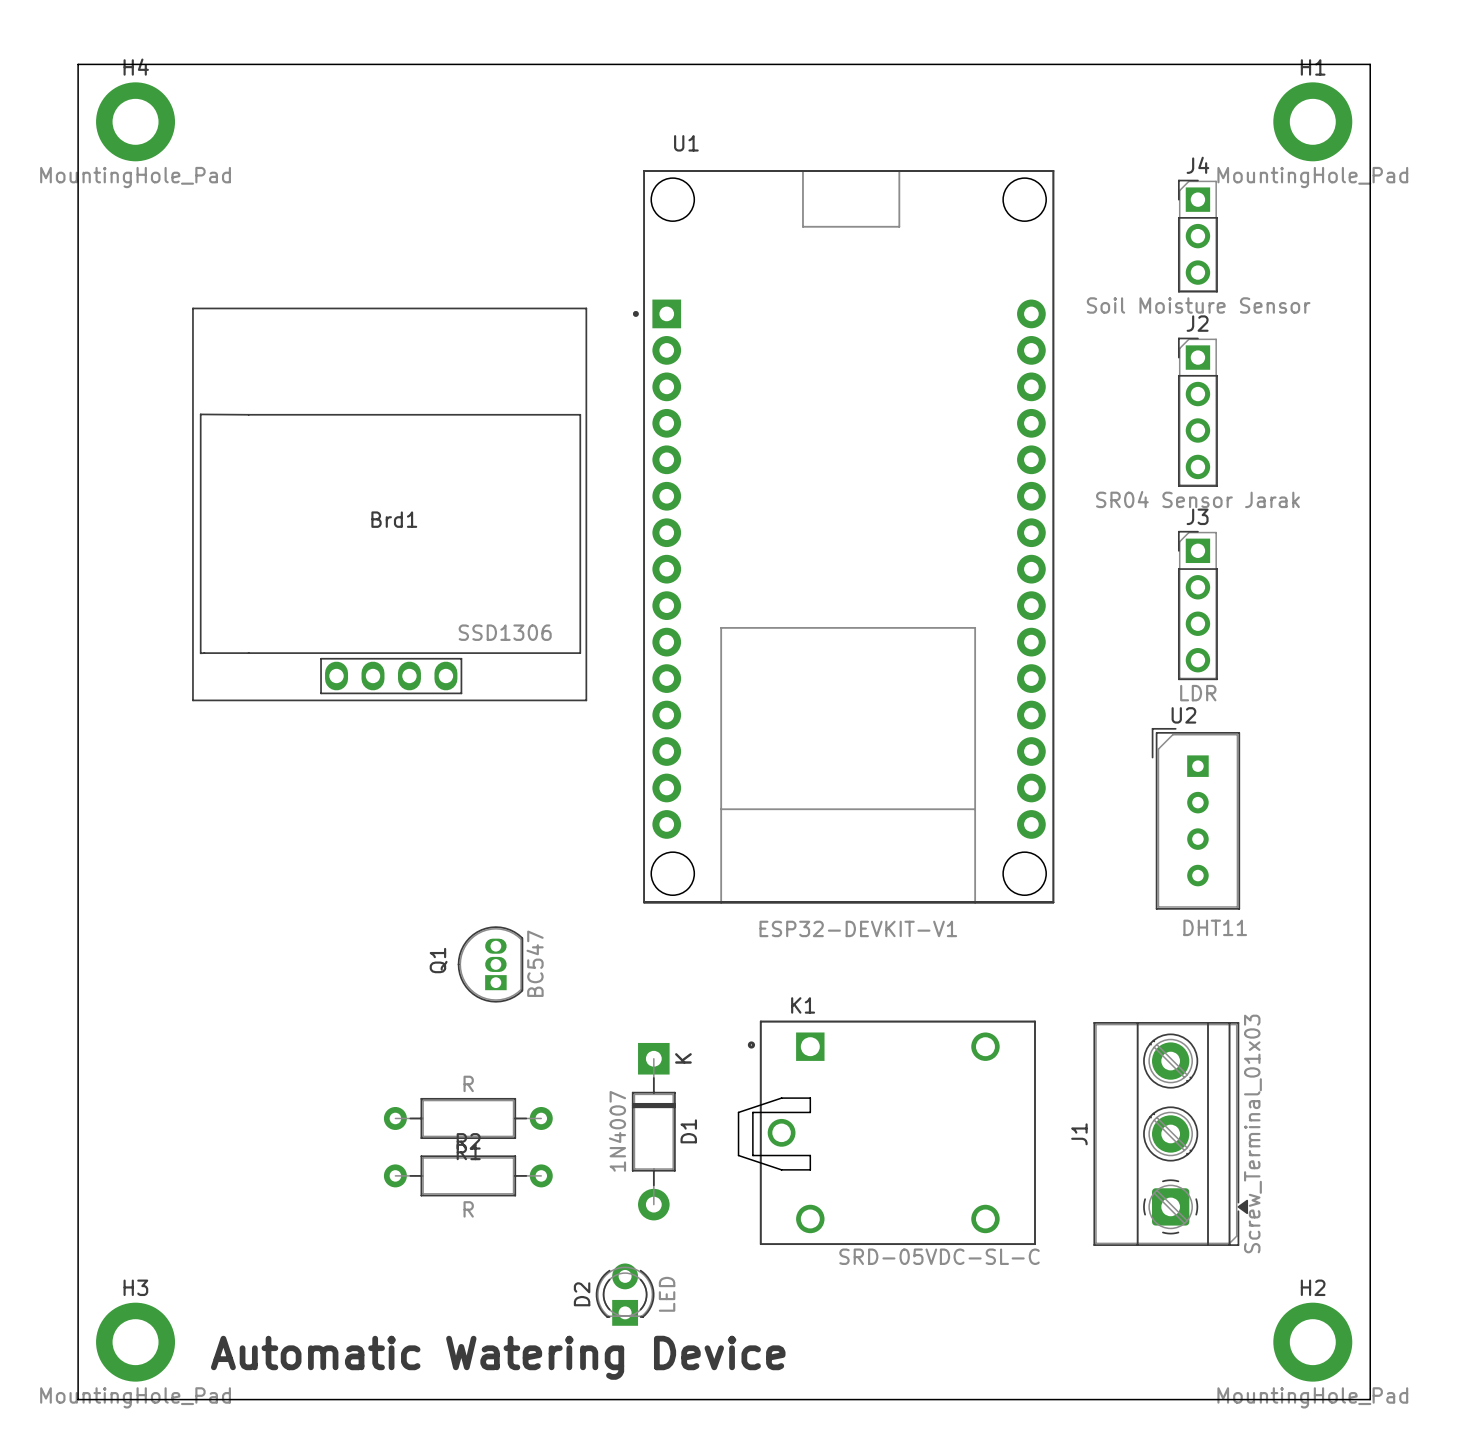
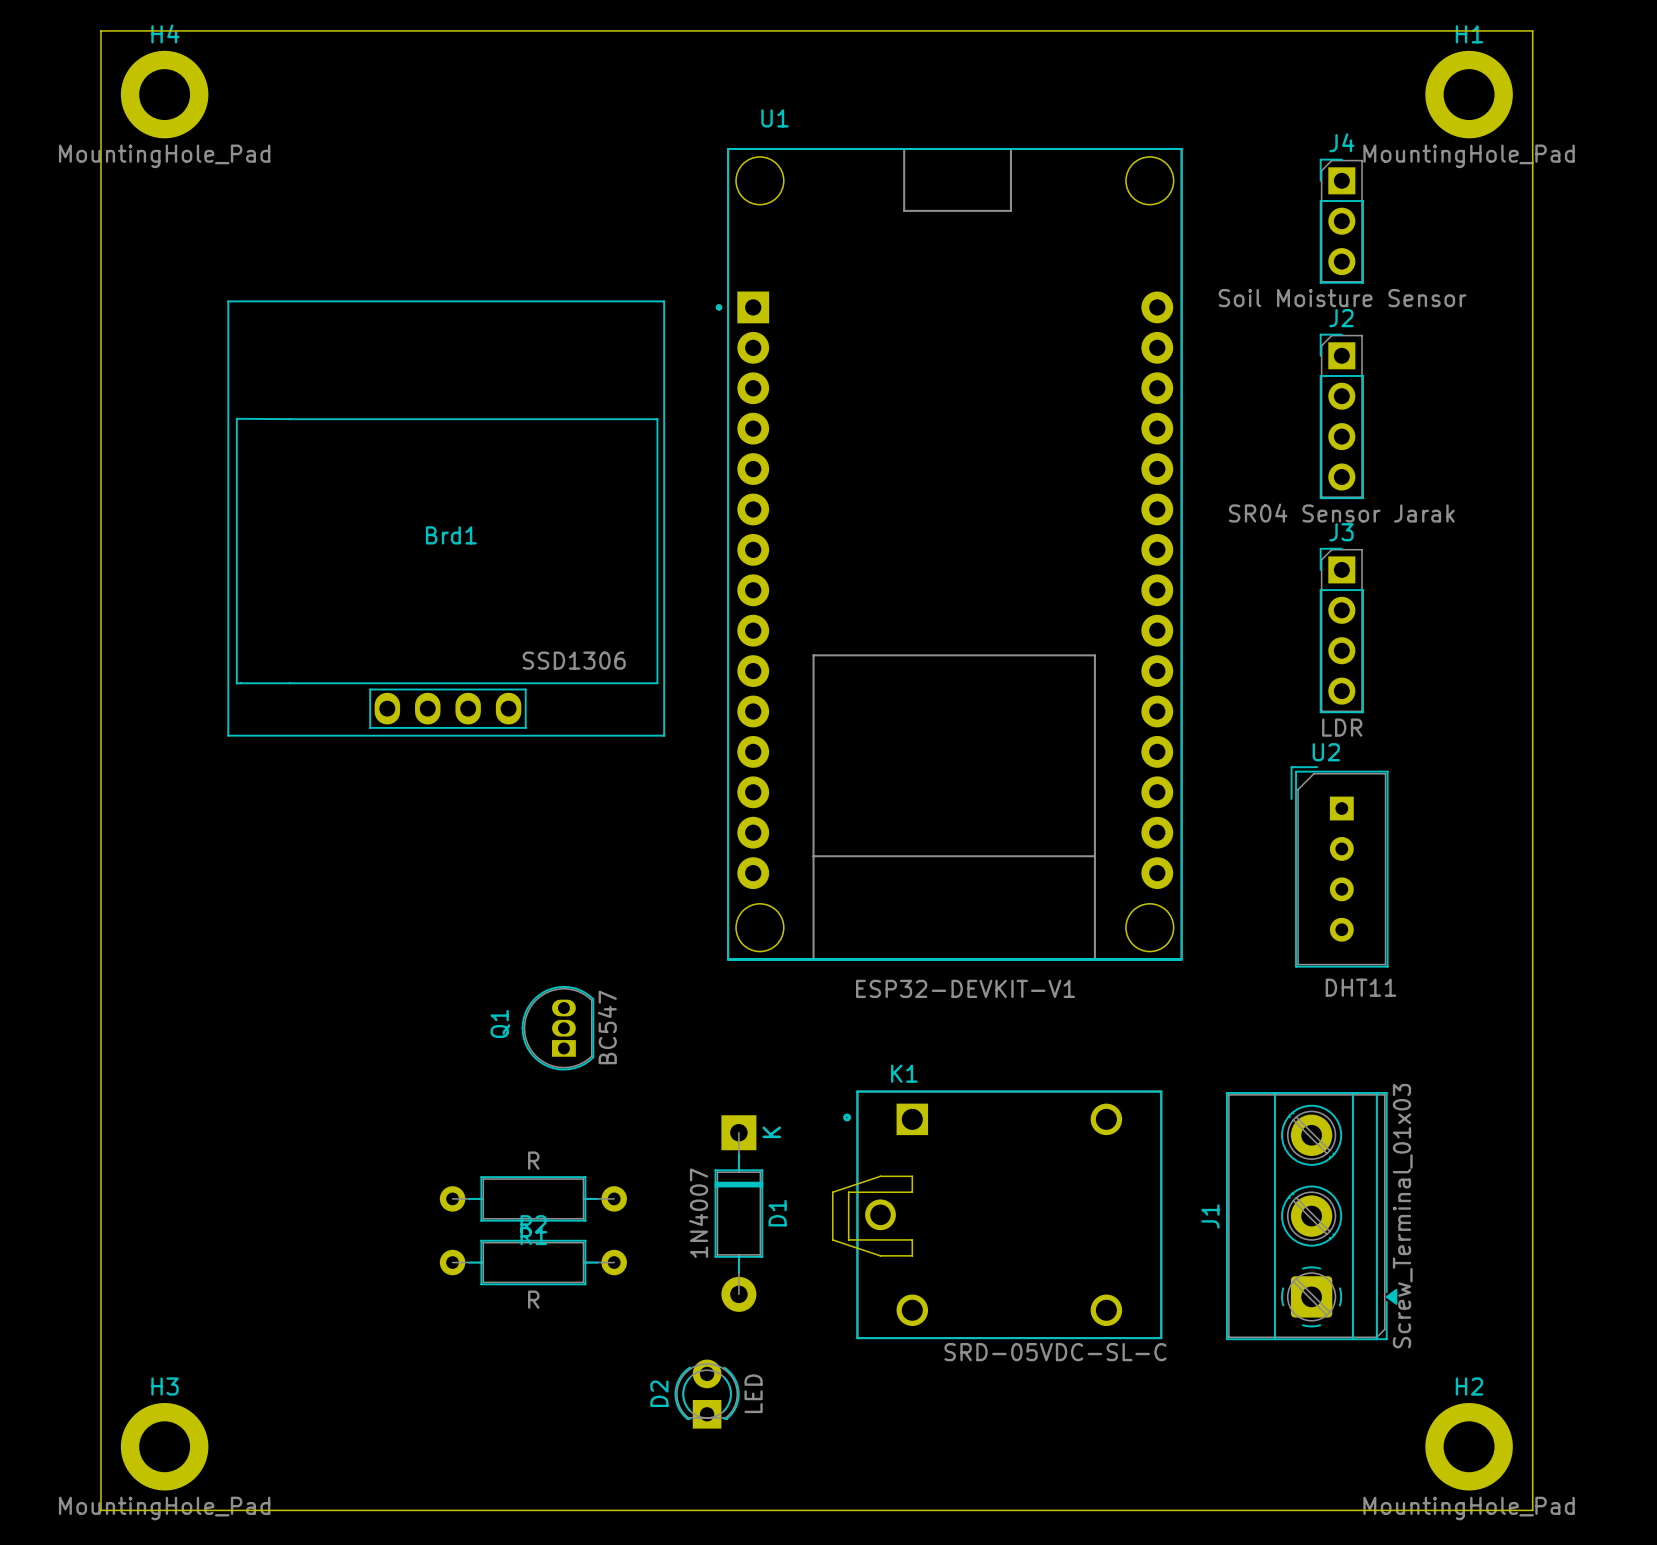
text: Automatic Watering Device (498, 1357) -> none

